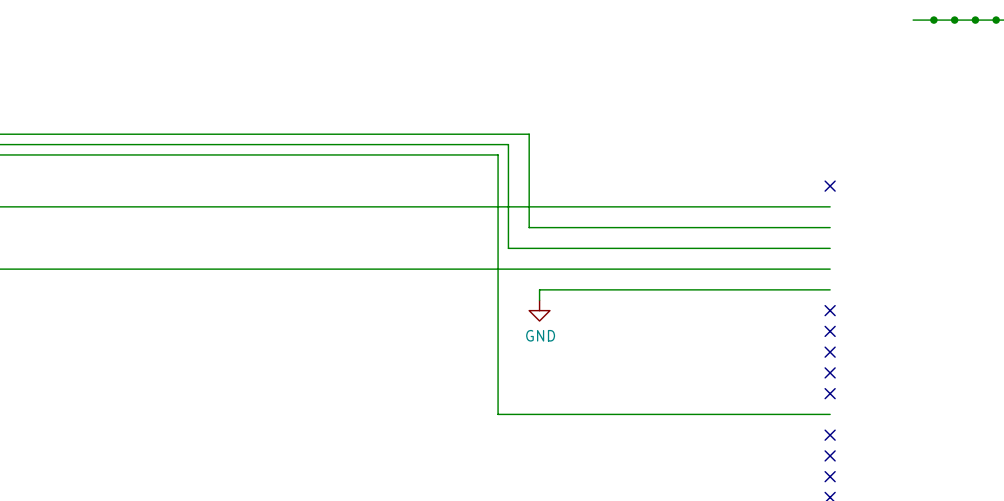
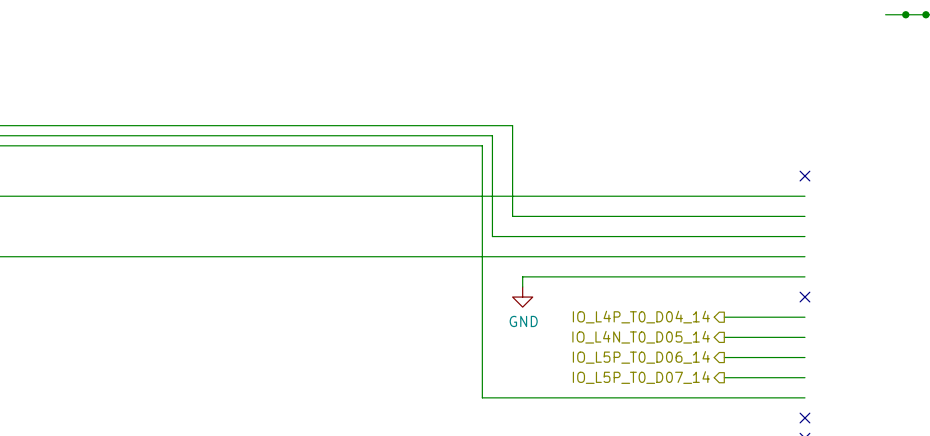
hierarchical label: none -> IO_L4P_T0_D04_14 (641, 317)
wire: none -> (724, 317) (804, 317)
no-connect mark: (830, 331) -> none
hierarchical label: none -> IO_L4N_T0_D05_14 (641, 337)
wire: none -> (724, 337) (804, 337)
no-connect mark: (830, 352) -> none
hierarchical label: none -> IO_L5P_T0_D06_14 (641, 357)
wire: none -> (724, 357) (804, 357)
no-connect mark: (830, 372) -> none
hierarchical label: none -> IO_L5P_T0_D07_14 (641, 377)
wire: none -> (724, 377) (804, 377)
no-connect mark: (830, 393) -> none

